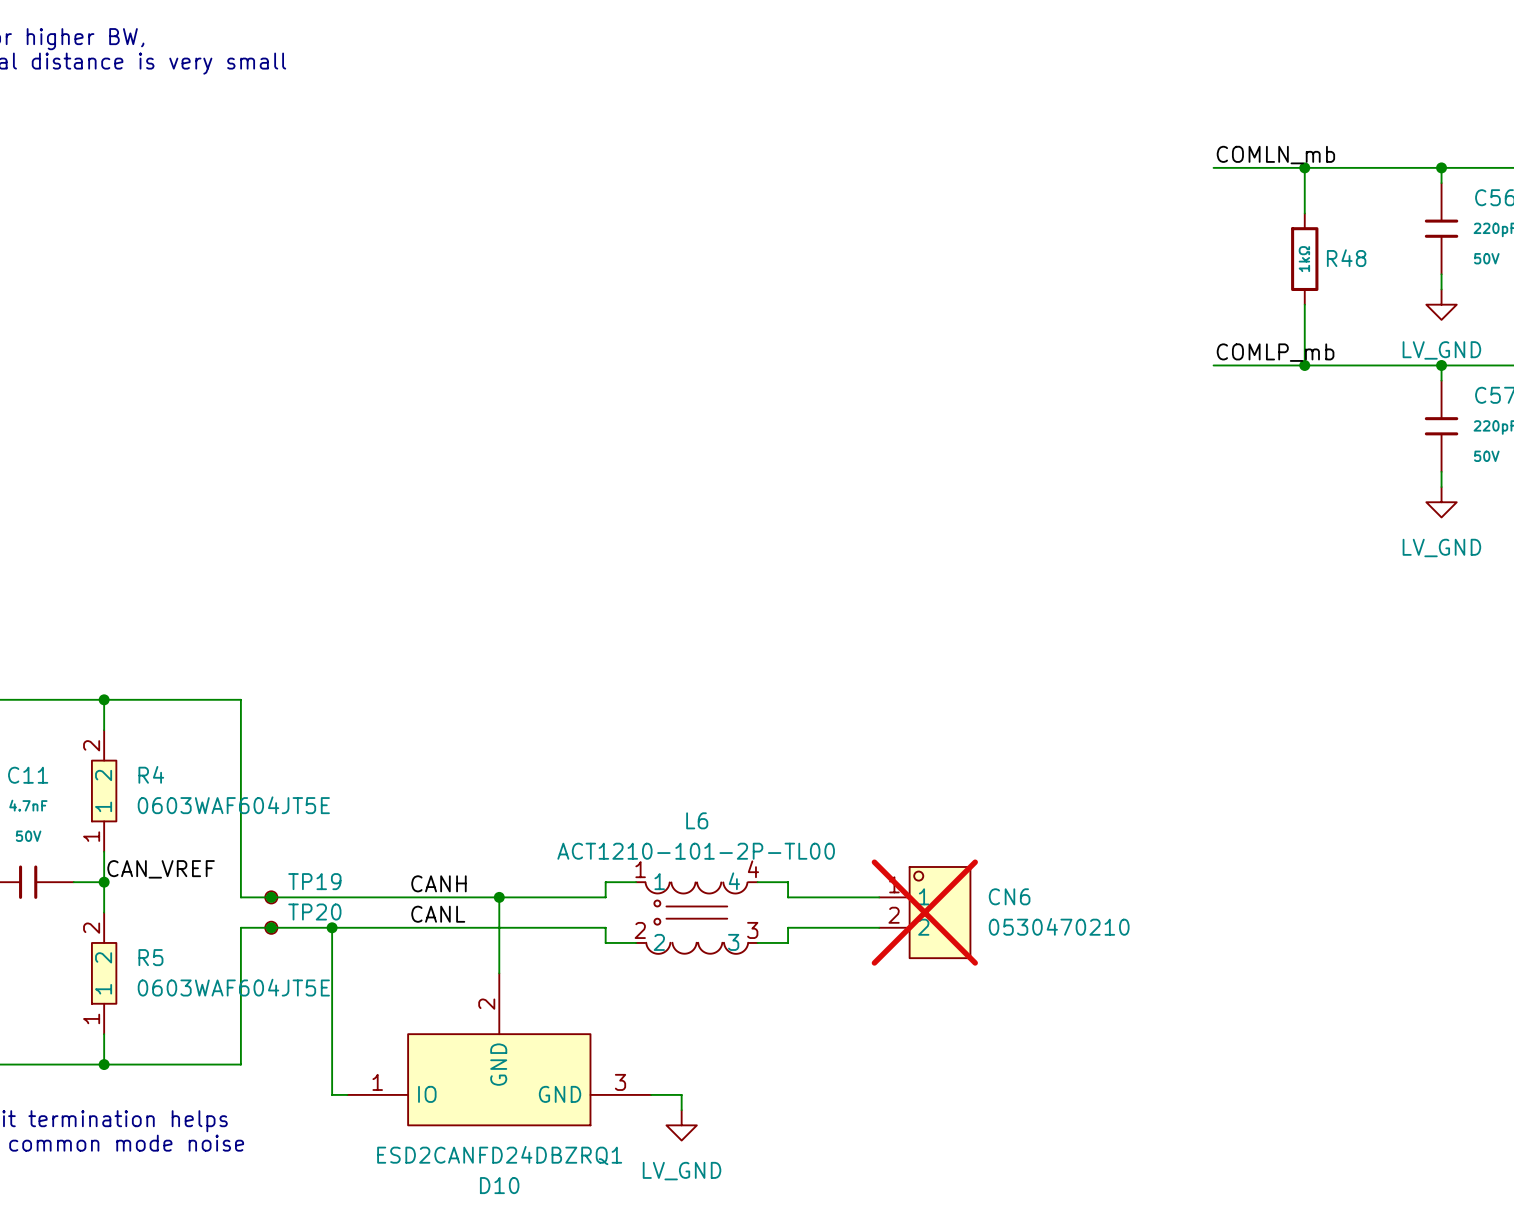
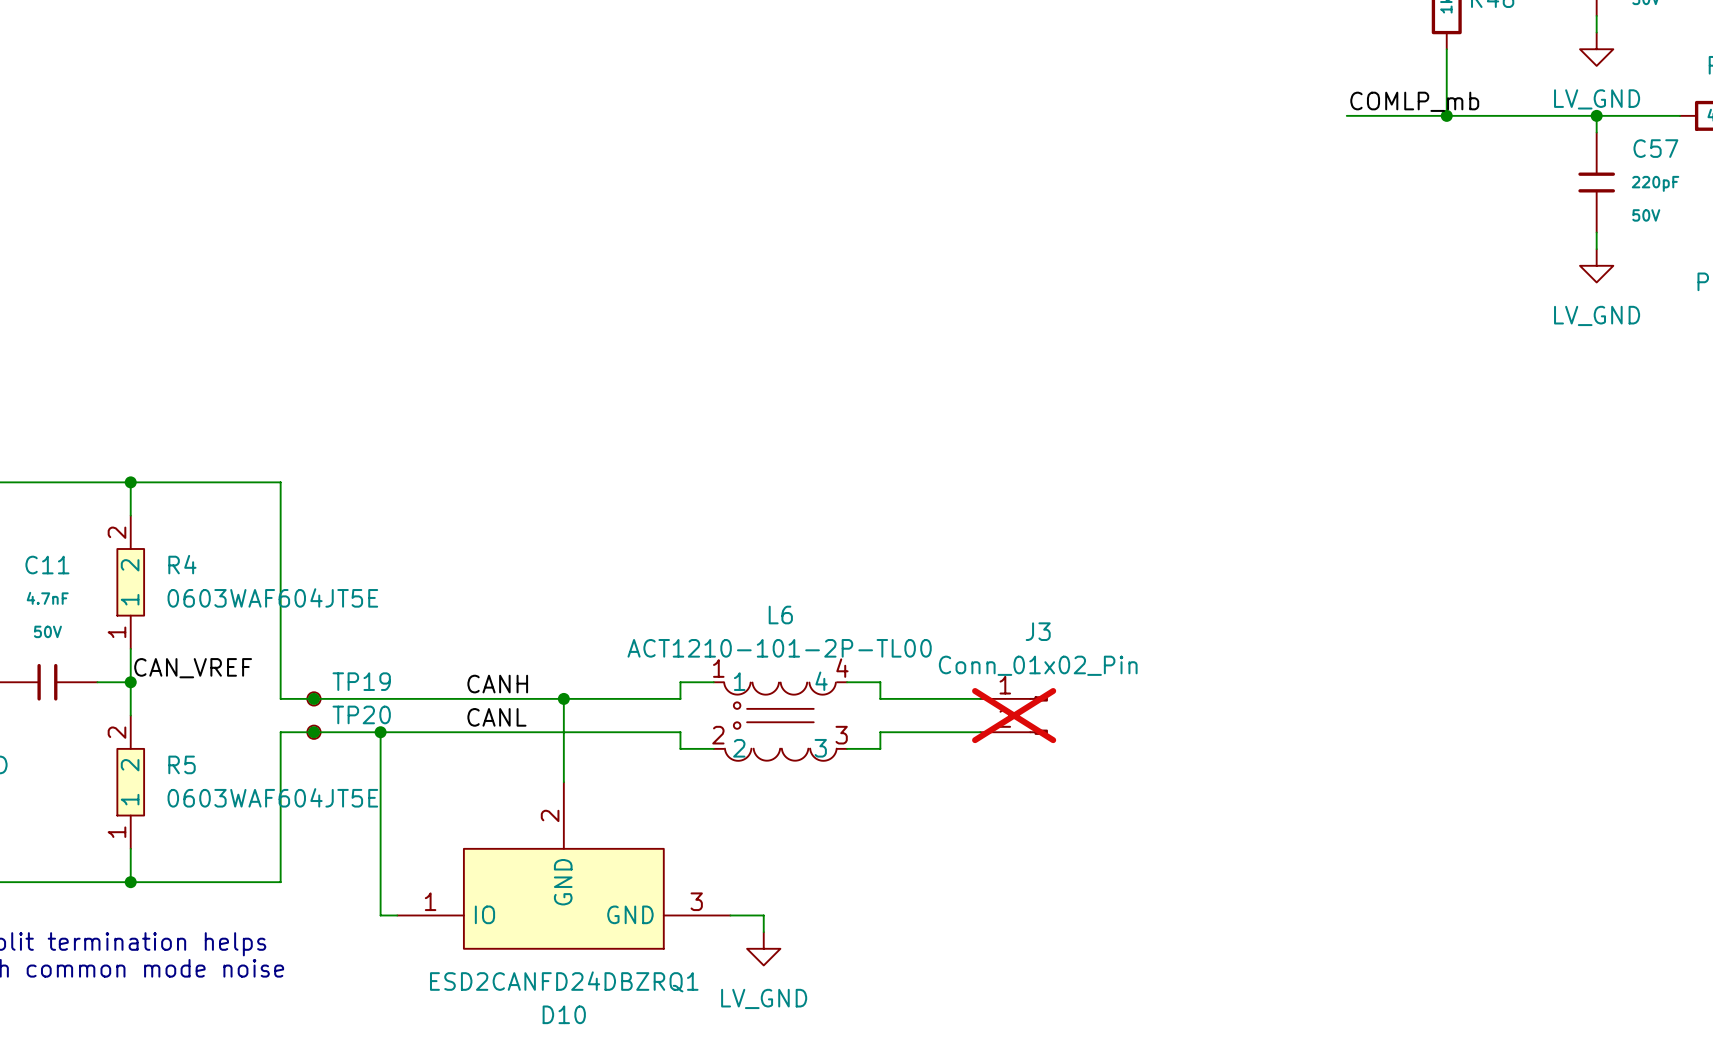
J3: none -> Conn_01x02_Pin (1014, 715)
CN6: 0530470210 (924, 912) -> none

